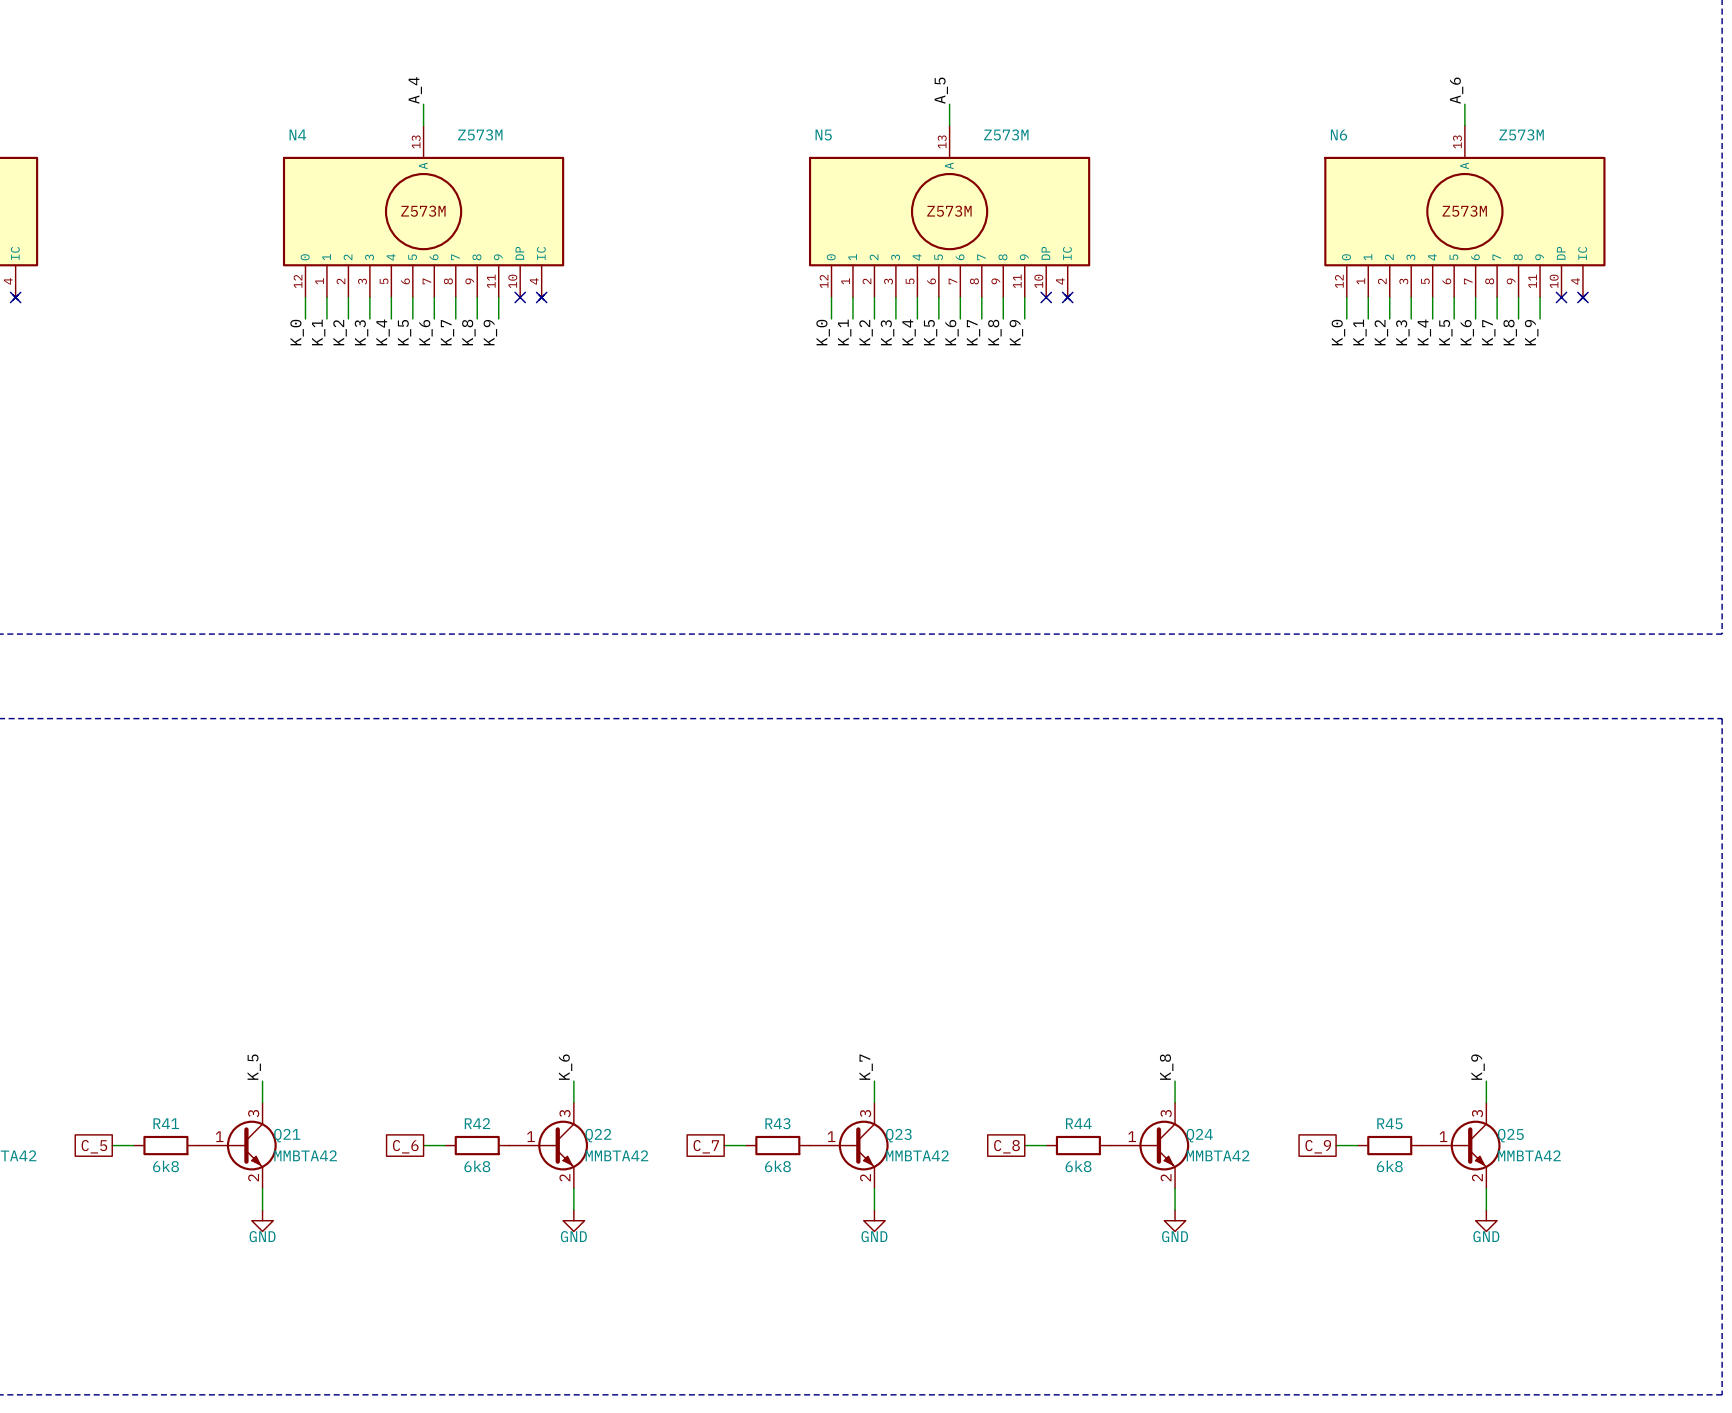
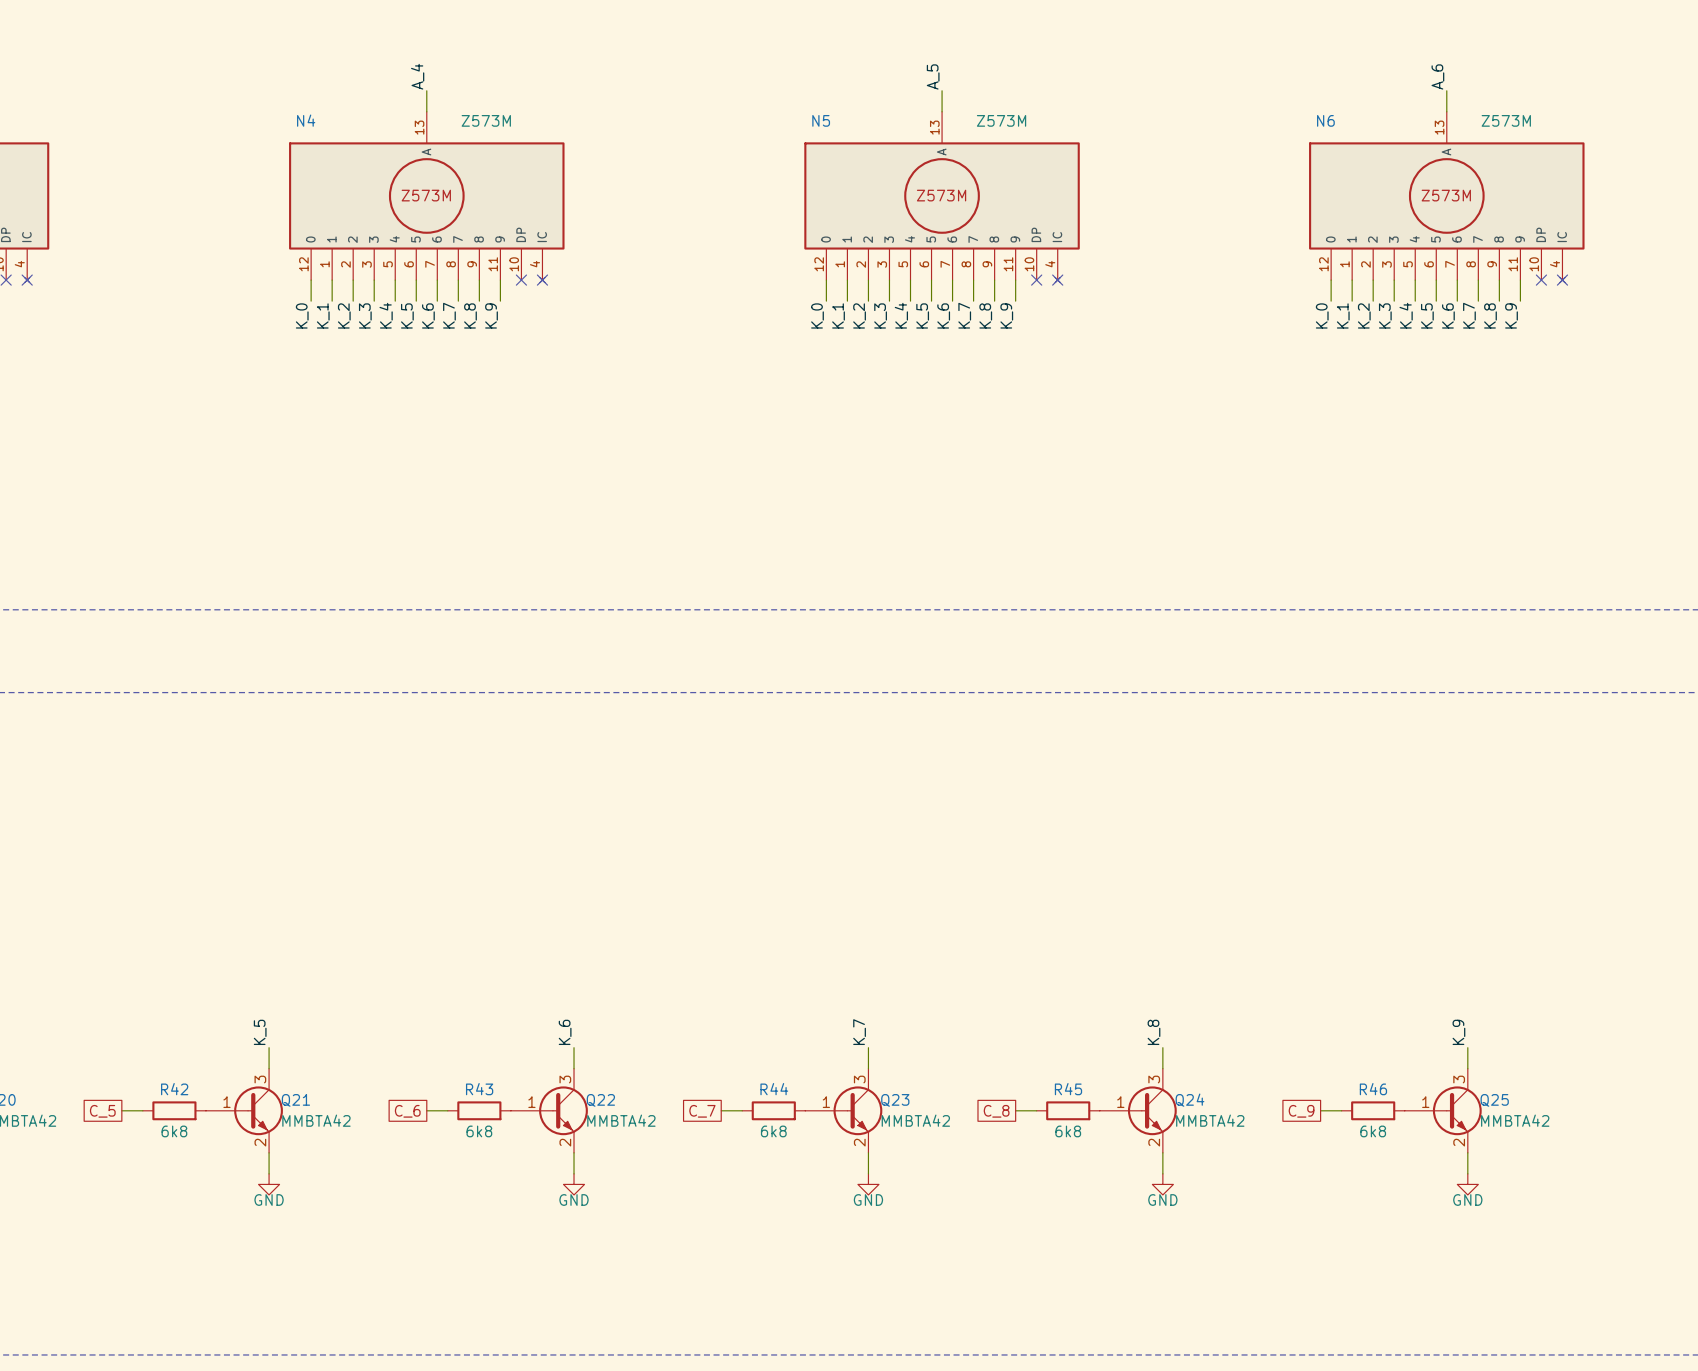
R41 name: R41 (166, 1123) -> R42 (174, 1089)
R42 name: R42 (477, 1123) -> R43 (479, 1089)
R43 name: R43 (777, 1123) -> R44 (774, 1089)
R44 name: R44 (1078, 1123) -> R45 (1068, 1089)
R45 name: R45 (1389, 1123) -> R46 (1373, 1089)

